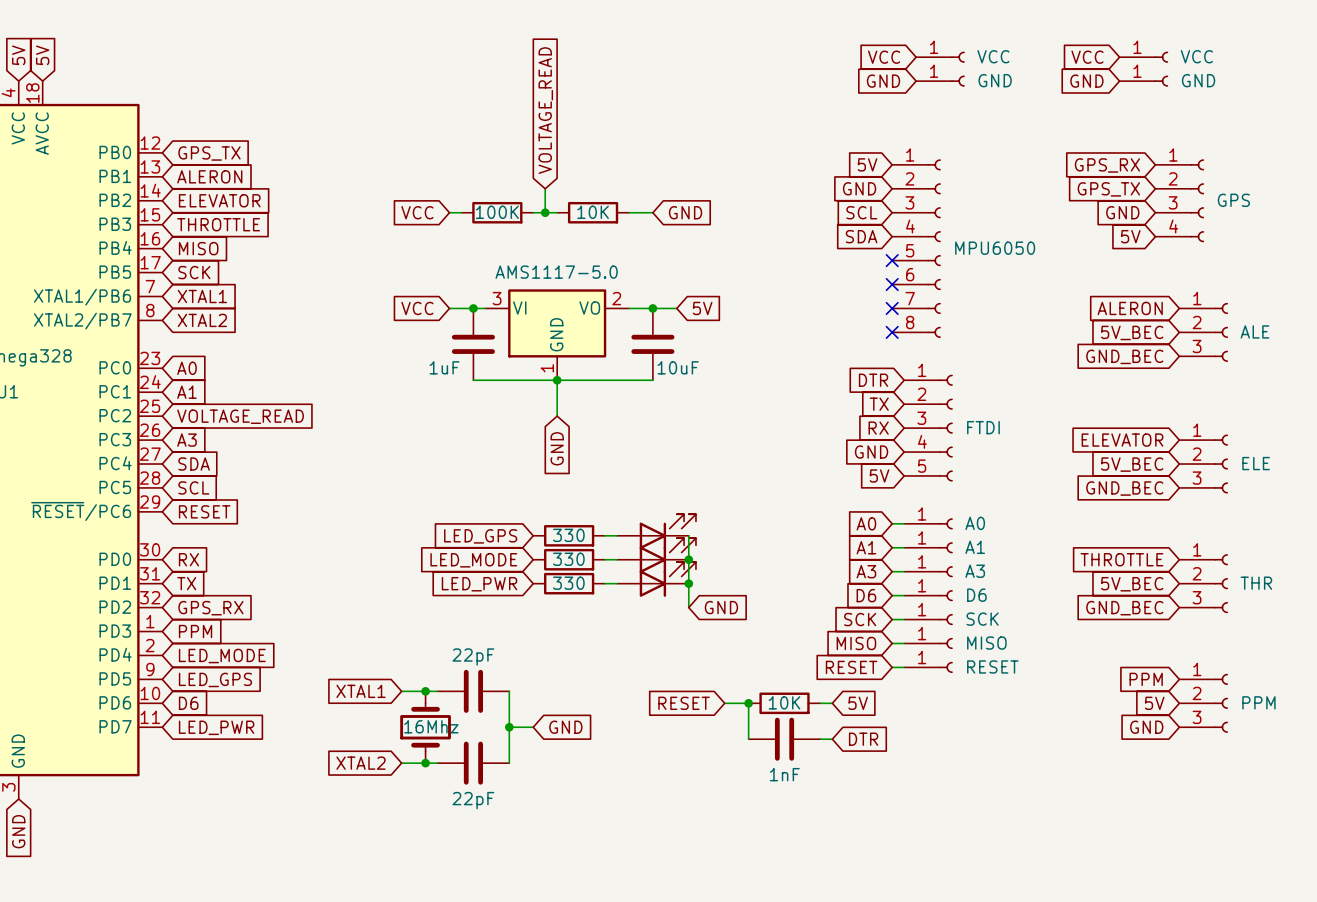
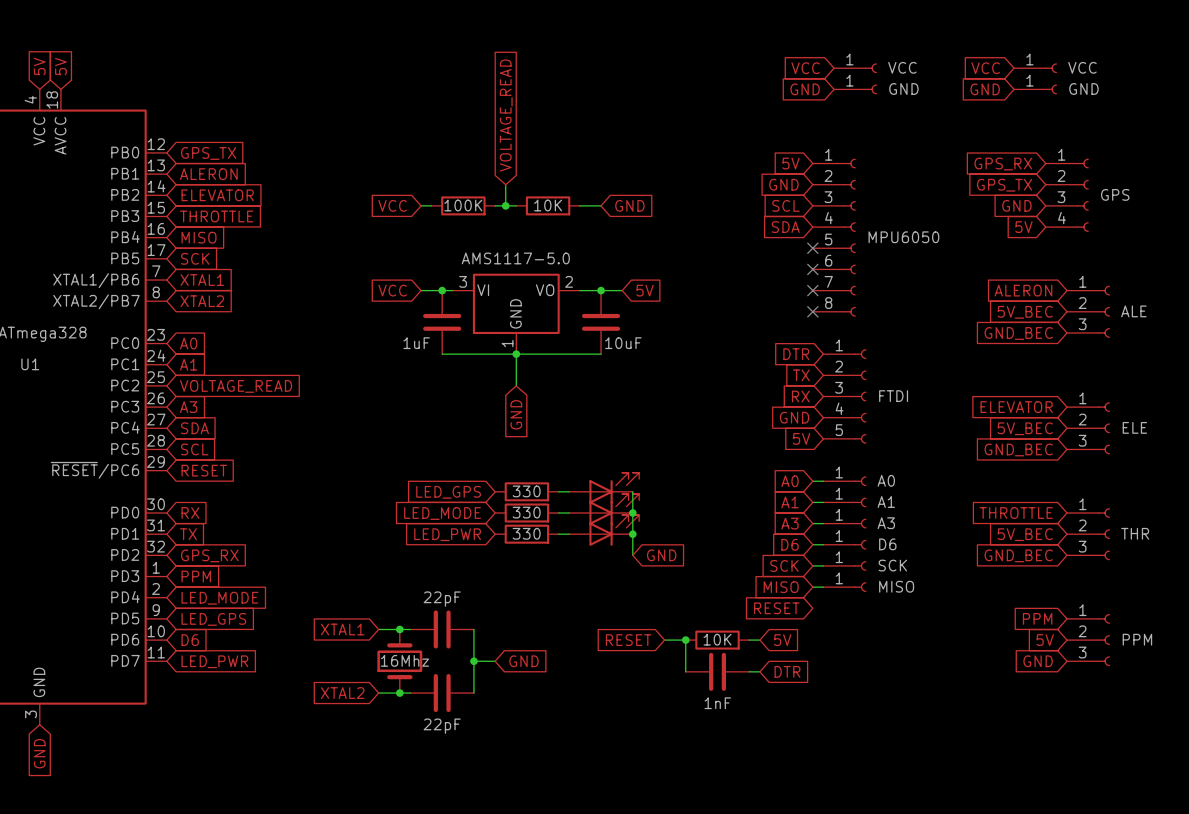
wire: (892, 667) (904, 667) -> none
part: RESET (928, 667) -> none

